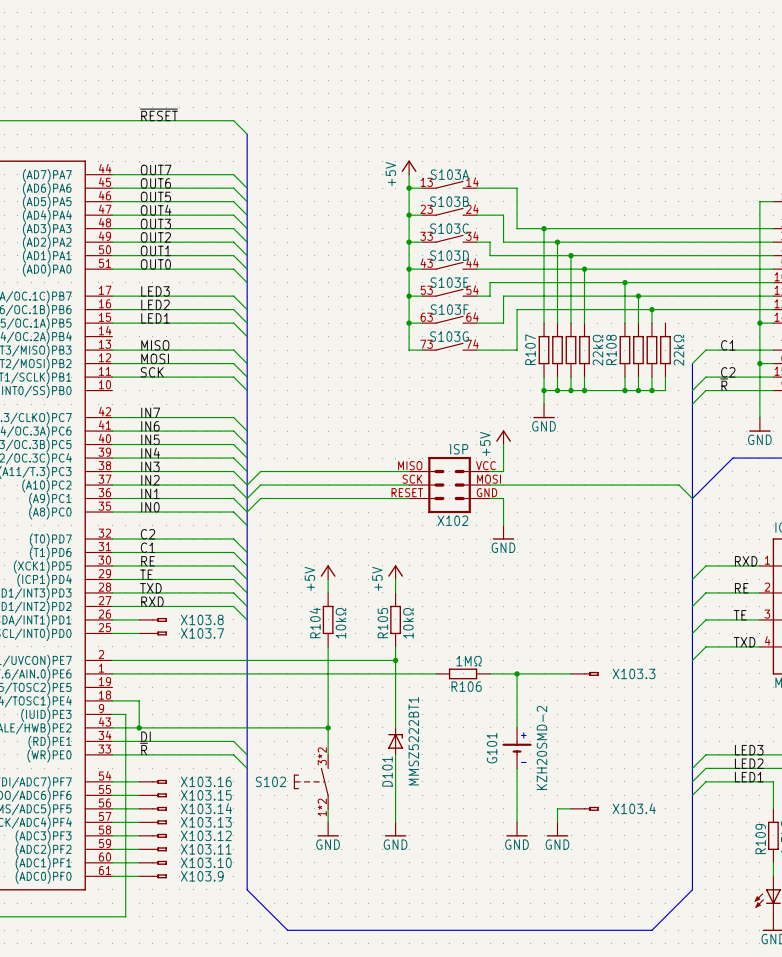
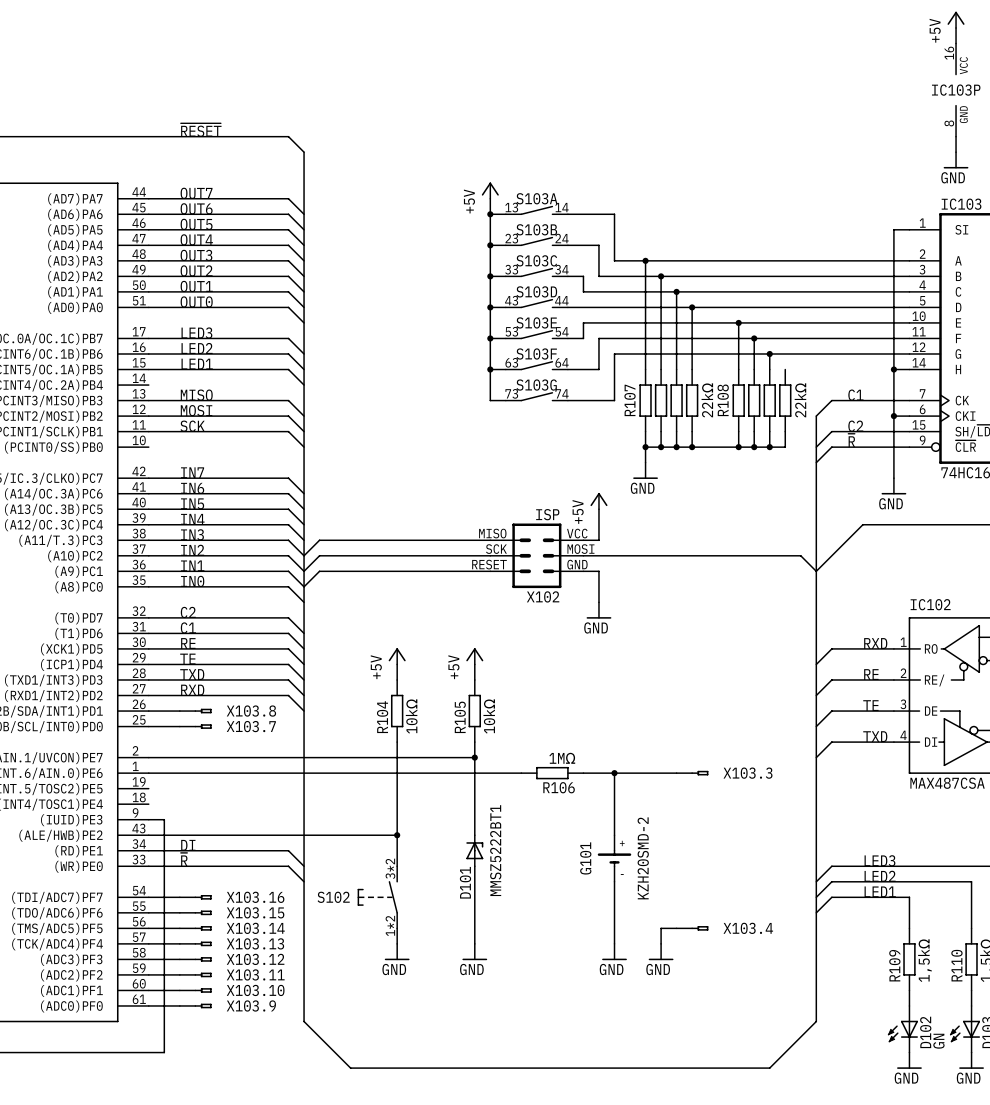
wire: (112, 700) (139, 700) (139, 727) -> none
junction: (139, 727) -> none

